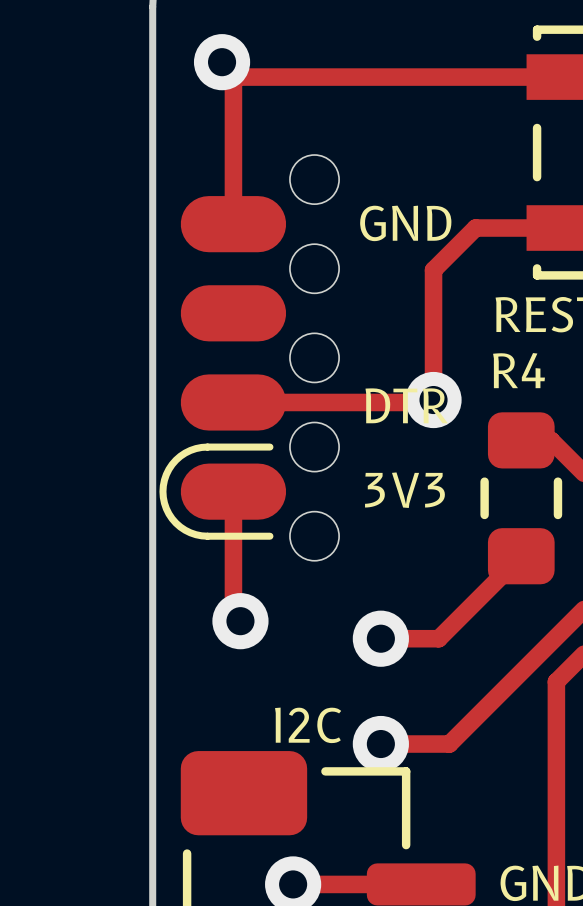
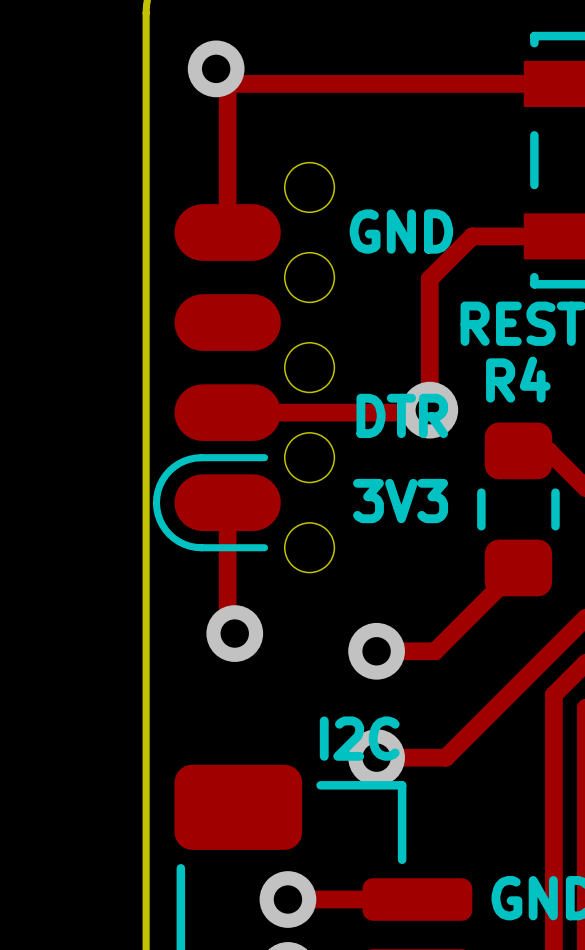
part value position: I2C (308, 725) -> I2C (359, 738)

